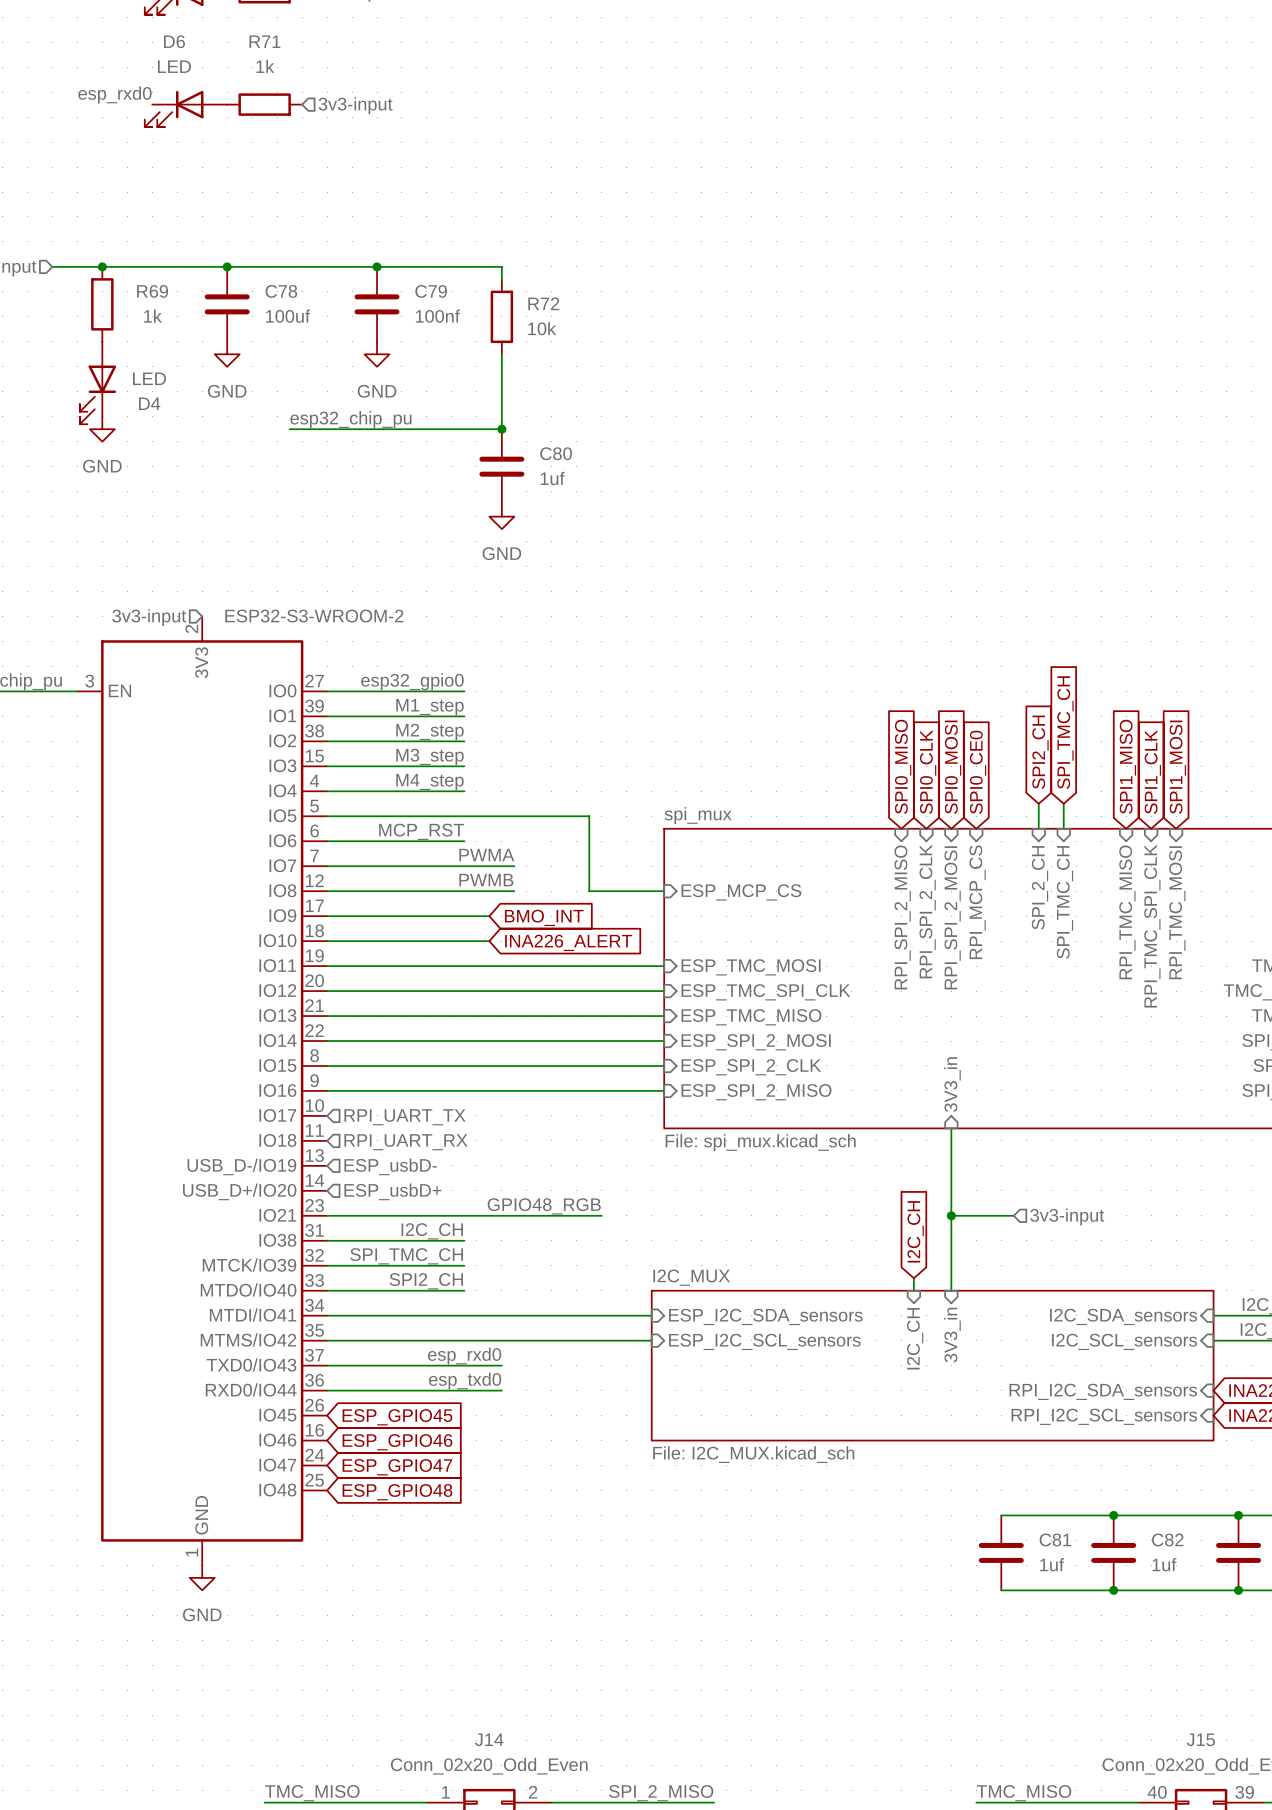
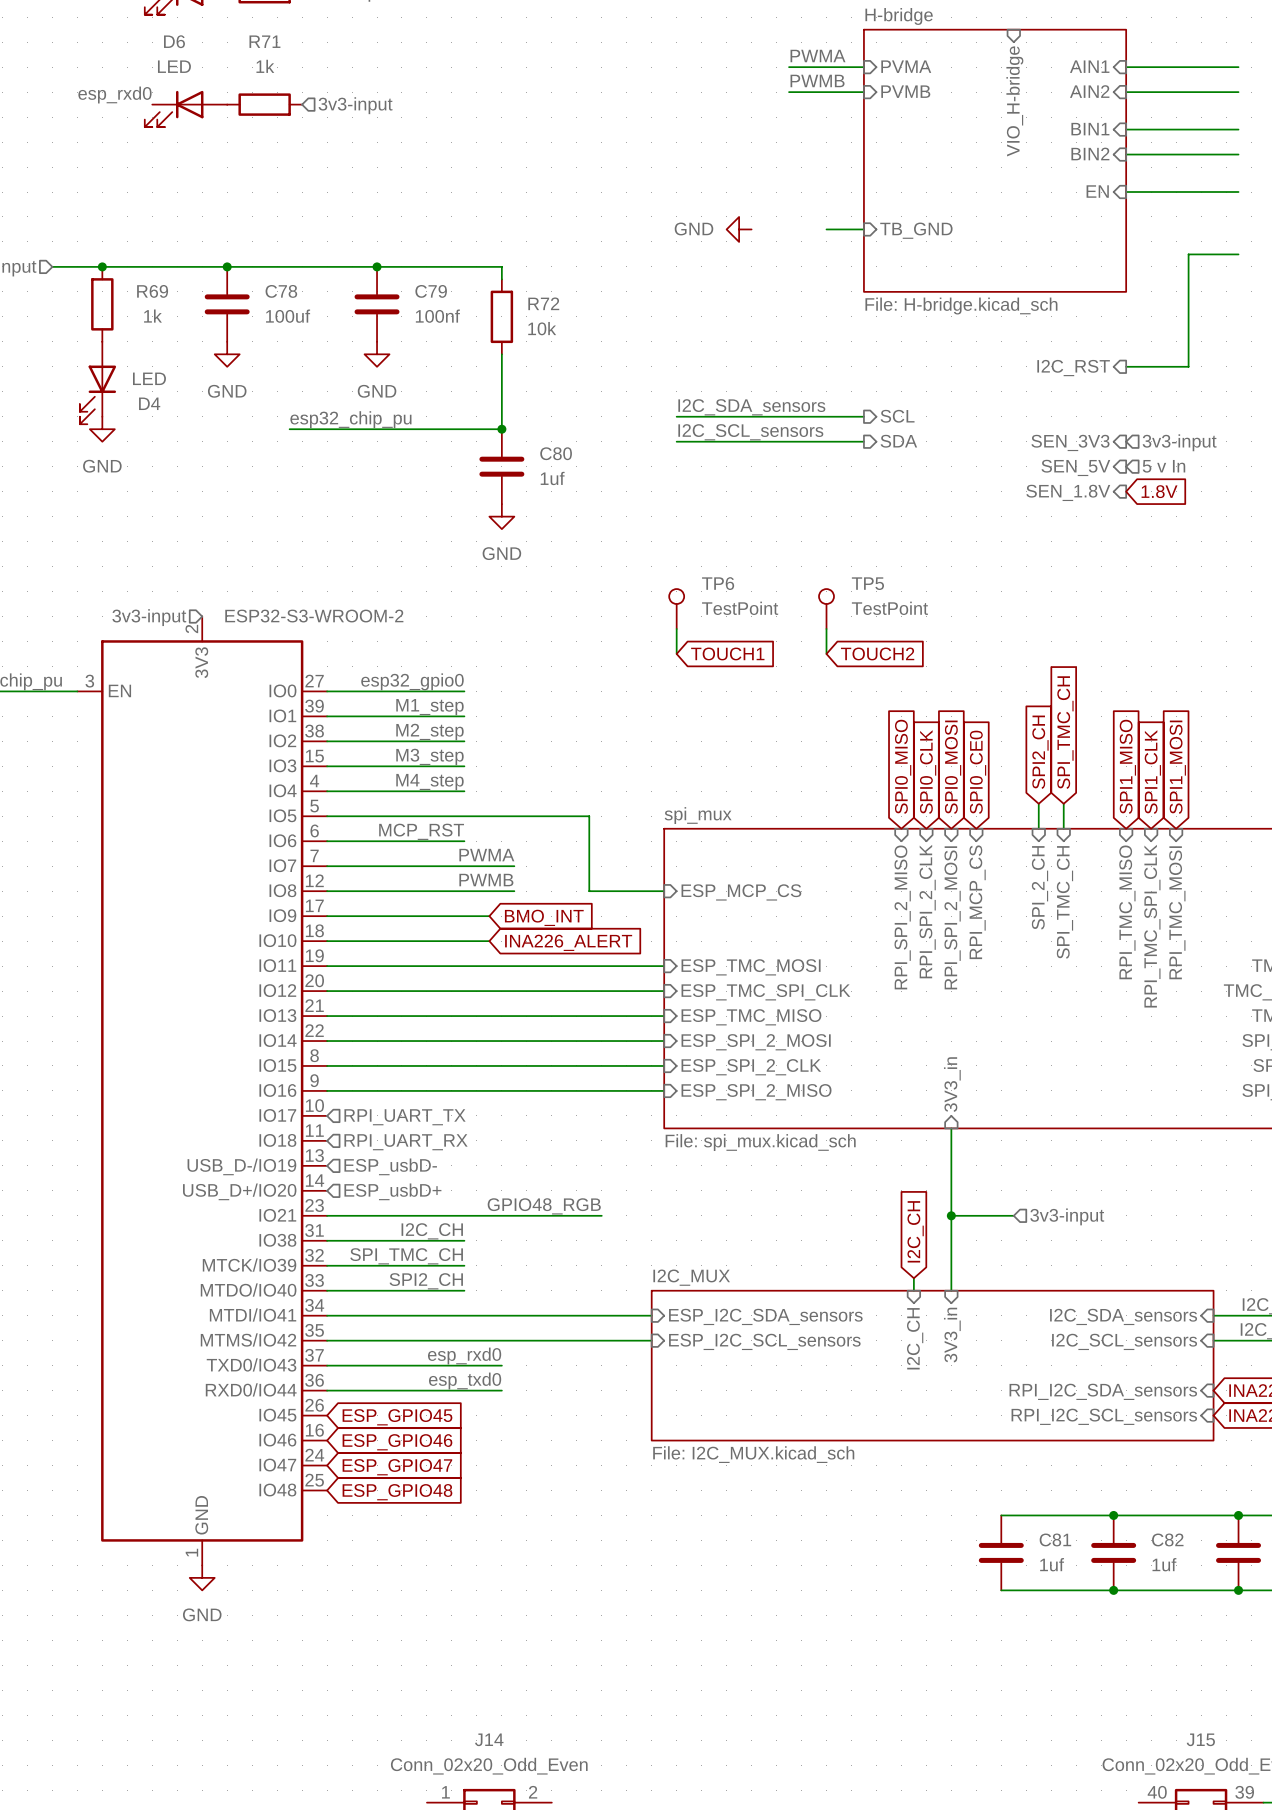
label: none -> PWMA (818, 56)
sheet pin: none -> PVMA (906, 66)
sheet pin: none -> AIN1 (1089, 66)
wire: none -> (789, 67) (863, 67)
wire: none -> (1126, 67) (1238, 67)
label: none -> PWMB (817, 80)
sheet pin: none -> PVMB (905, 91)
sheet pin: none -> AIN2 (1089, 91)
wire: none -> (789, 92) (863, 92)
wire: none -> (1126, 92) (1238, 92)
sheet pin: none -> VIO_H-bridge (1014, 101)
sheet pin: none -> BIN1 (1090, 129)
wire: none -> (1126, 129) (1238, 129)
sheet pin: none -> BIN2 (1090, 153)
wire: none -> (1126, 154) (1238, 154)
sheet H-bridge: none -> File: H-bridge.kicad_sch (995, 160)
sheet pin: none -> EN (1097, 191)
wire: none -> (1126, 192) (1238, 192)
power symbol: none -> GND (739, 229)
wire: none -> (826, 229) (863, 229)
sheet pin: none -> TB_GND (916, 230)
wire: none -> (1238, 254) (1188, 254) (1188, 366) (1126, 366)
sheet pin: none -> I2C_RST (1073, 368)
label: none -> I2C_SDA_sensors (751, 407)
wire: none -> (676, 416) (863, 416)
sheet pin: none -> SCL (897, 416)
label: none -> I2C_SCL_sensors (750, 432)
wire: none -> (676, 441) (863, 441)
sheet pin: none -> SDA (898, 441)
sheet pin: none -> SEN_3V3 (1070, 442)
hierarchical label: none -> 3v3-input (1179, 442)
hierarchical label: none -> 5 v In (1163, 466)
sheet pin: none -> SEN_5V (1075, 467)
global label: none -> 1.8V (1159, 491)
sheet pin: none -> SEN_1.8V (1068, 492)
TP6: none -> TestPoint (676, 609)
TP5: none -> TestPoint (826, 609)
wire: none -> (676, 628) (676, 653)
wire: none -> (826, 628) (826, 653)
global label: none -> TOUCH1 (727, 653)
global label: none -> TOUCH2 (877, 653)
label: TMC_MISO (312, 1793) -> none
label: SPI_2_MISO (661, 1793) -> none
label: TMC_MISO (1023, 1793) -> none
wire: (264, 1802) (426, 1802) -> none
wire: (551, 1802) (714, 1802) -> none
wire: (976, 1802) (1138, 1802) -> none

